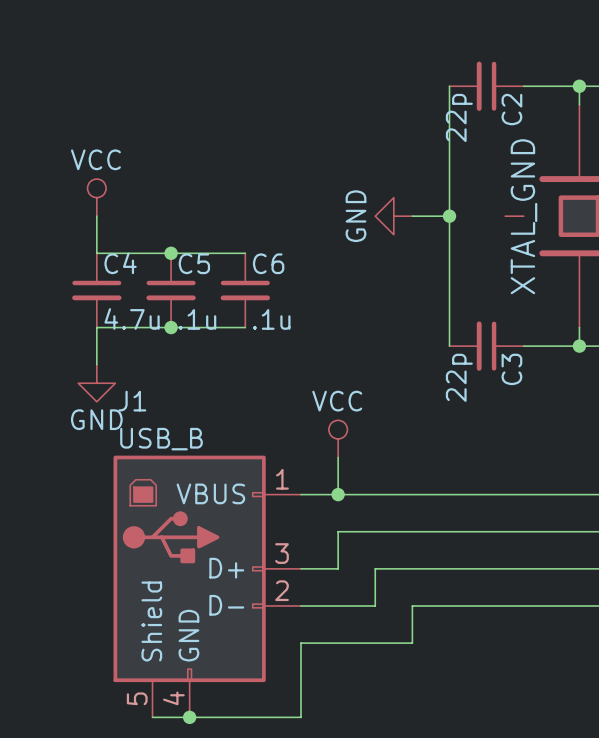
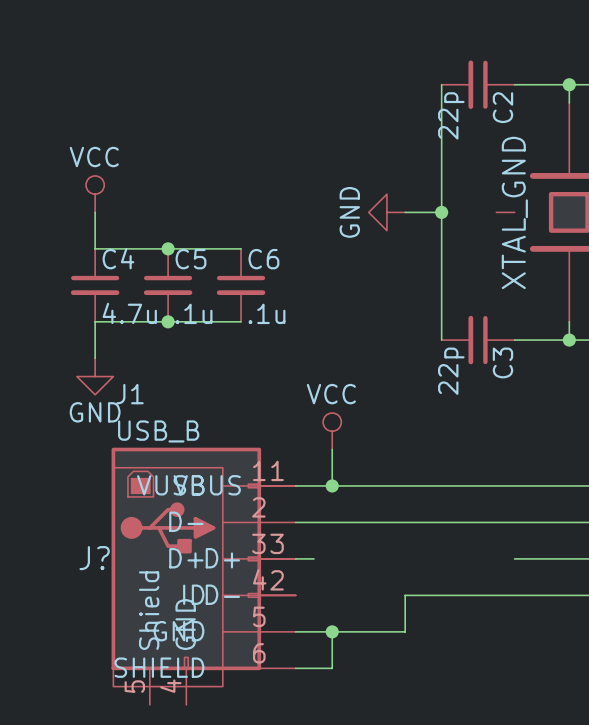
wire: (338, 531) (338, 568) (319, 568) -> (332, 522) (295, 522)
wire: (523, 568) (375, 568) (375, 605) (301, 605) -> none
J?: none -> (204, 577)
wire: (301, 643) (301, 717) (152, 717) -> none
wire: none -> (332, 631) (332, 668) (295, 668)
junction: none -> (332, 631)
junction: (189, 717) -> none

